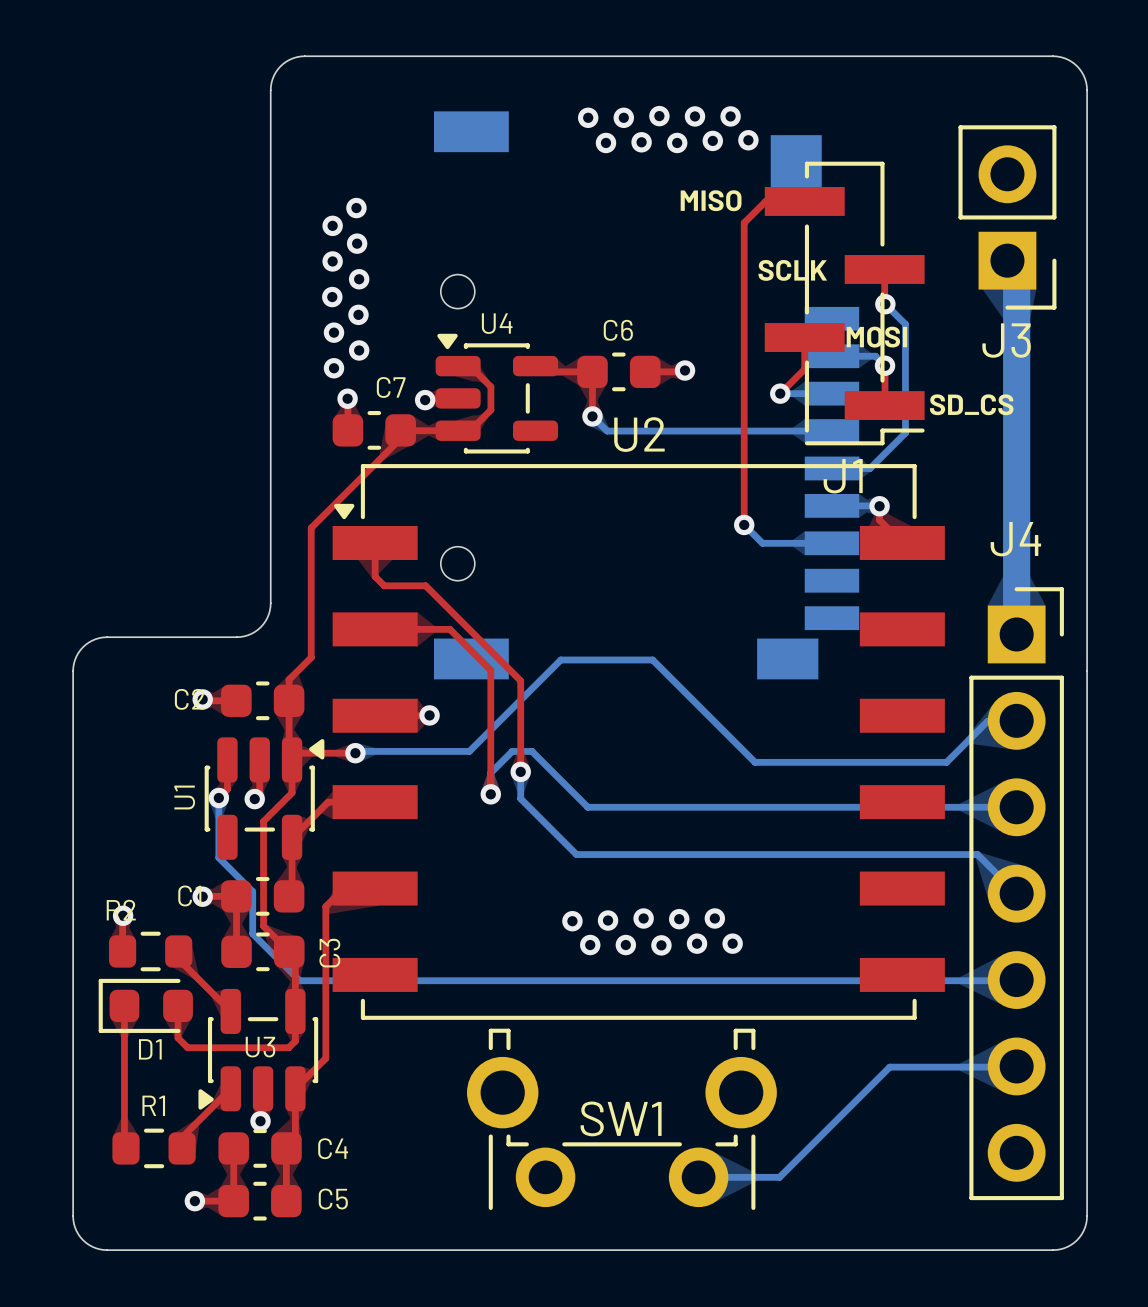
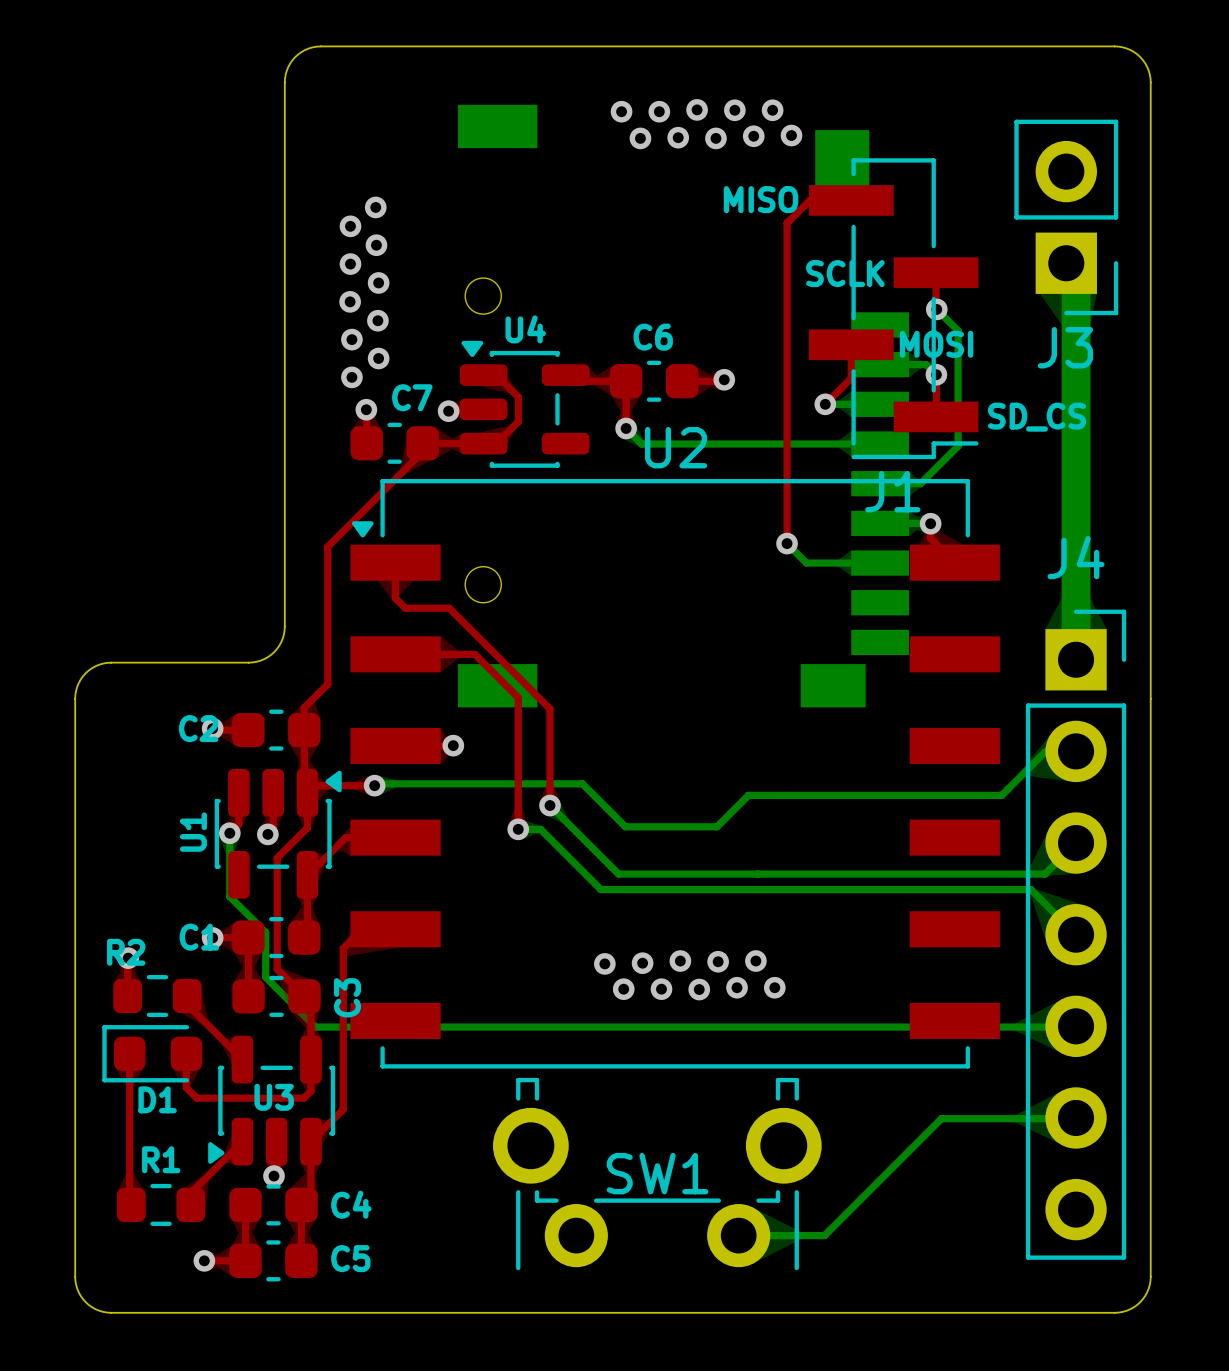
bottom track: (469, 751) (560, 659) (652, 659) (755, 762) -> (561, 783) (582, 783) (625, 826) (717, 826) (748, 795) (798, 795)
bottom track: (512, 751) (490, 772) (490, 794) -> (541, 783) (495, 783)
bottom track: (532, 751) (587, 807) (1016, 807) -> (550, 805) (618, 874) (1045, 874) (1076, 843)
bottom track: (520, 771) (520, 798) (576, 854) (977, 854) -> (518, 829) (540, 829) (600, 889) (1030, 889) (1034, 893)

